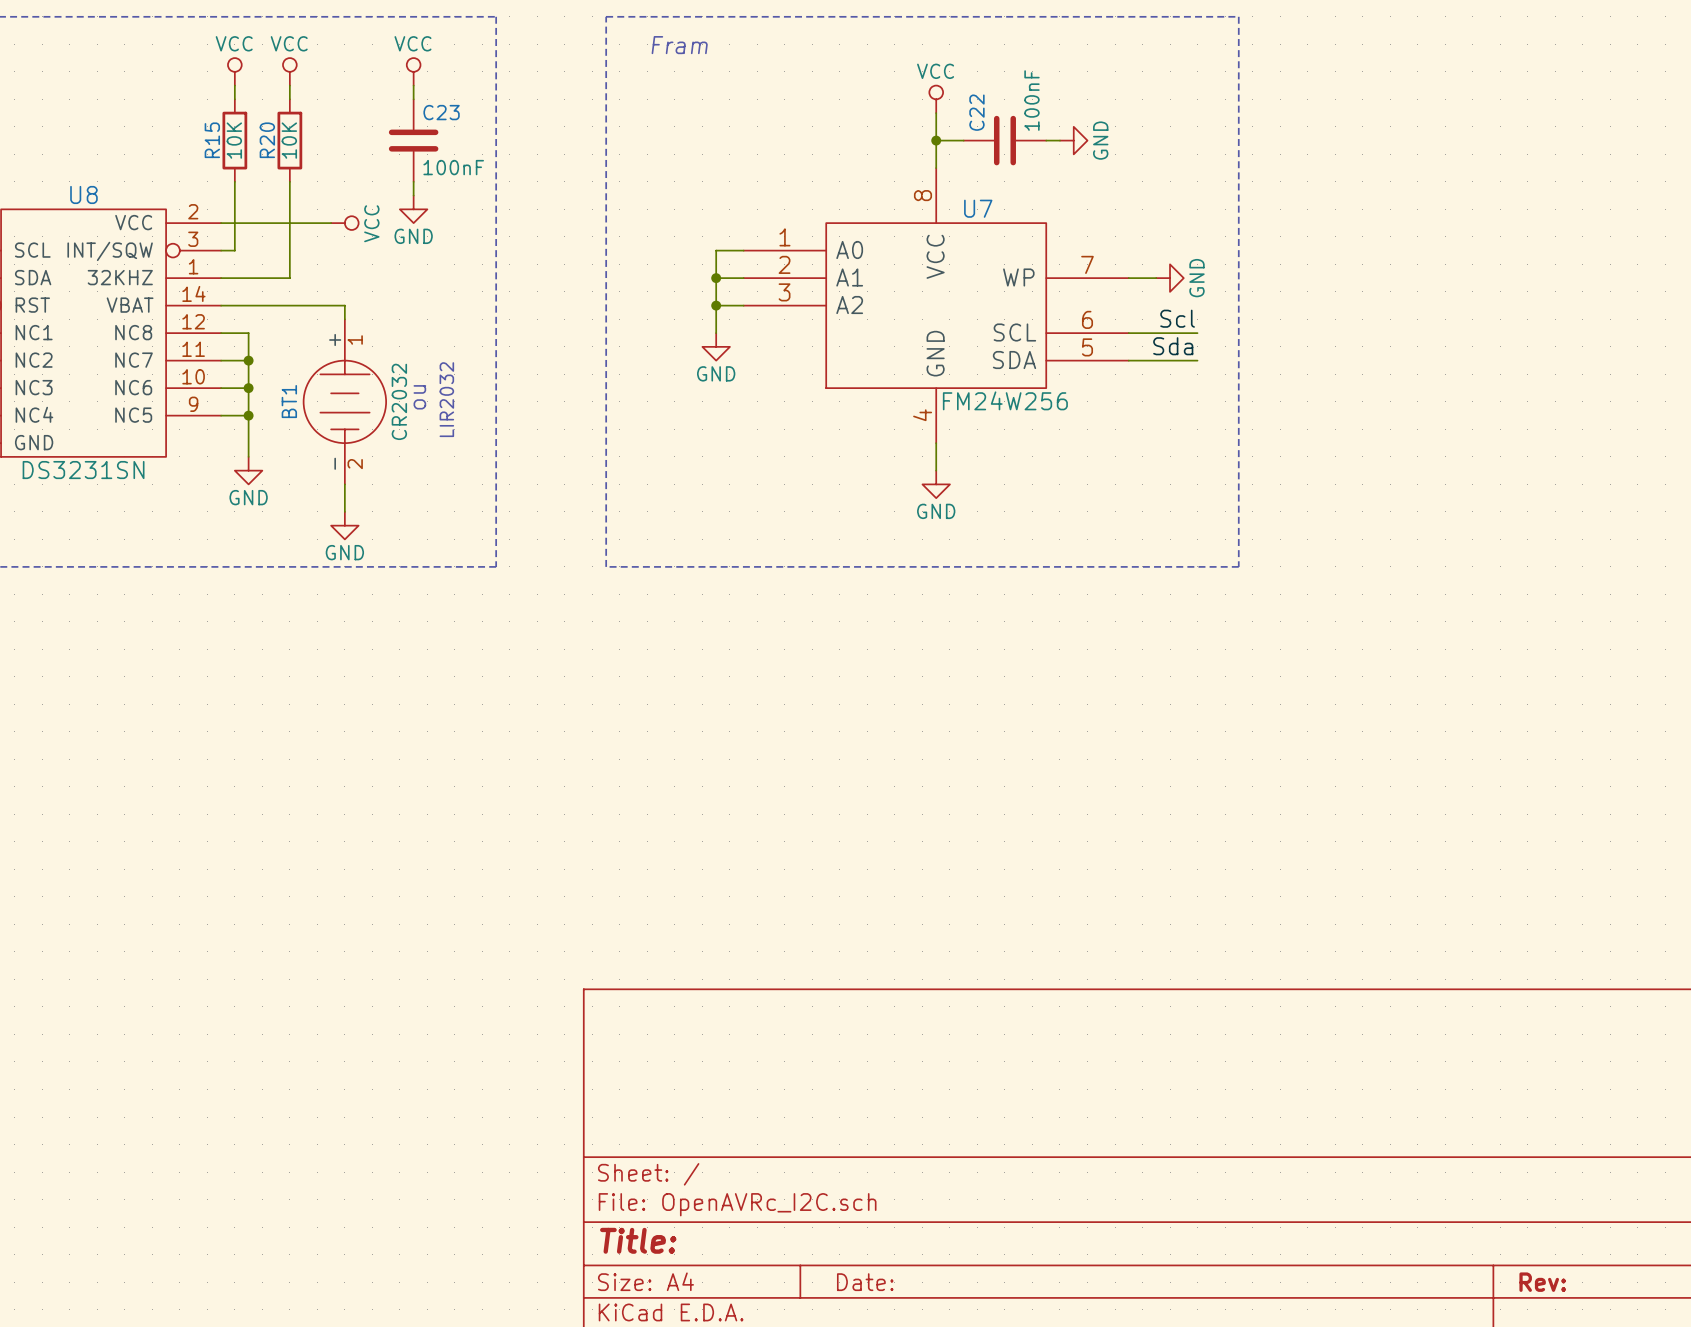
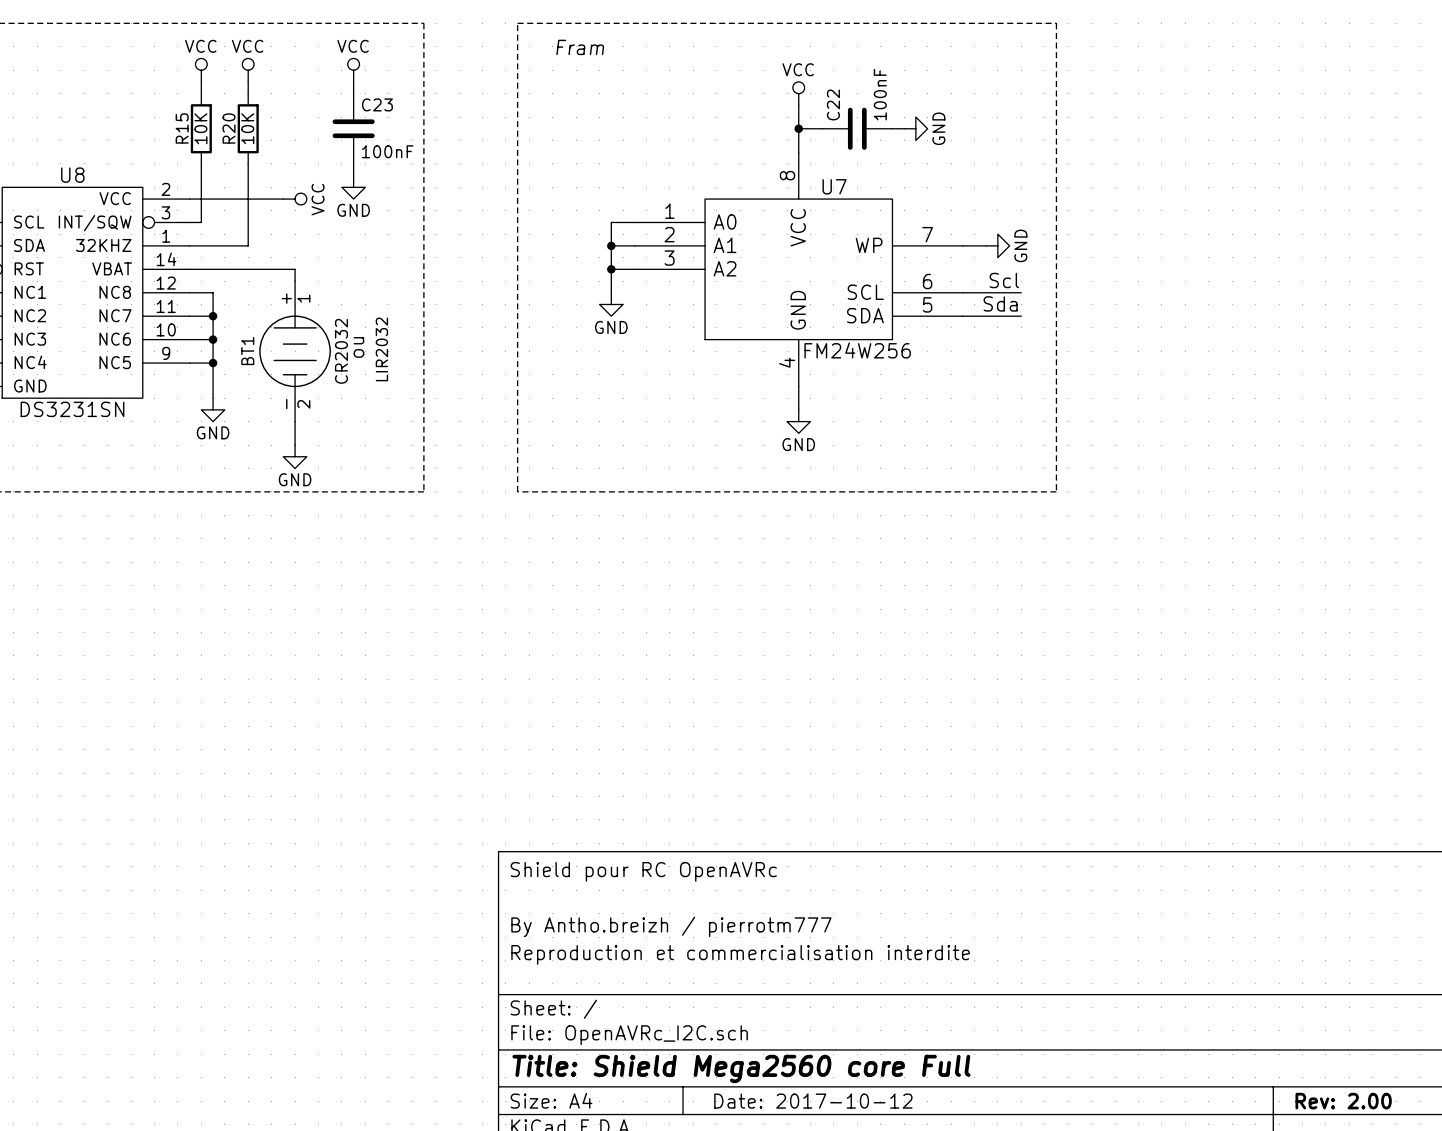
title block: none -> Shield pour RC OpenAVRc (643, 871)
title block: none -> By Antho.breizh / pierrotm777 (671, 926)
title block: none -> Reproduction et commercialisation interdite (740, 954)
title block: Title: (638, 1240) -> Title: Shield Mega2560 core Full (741, 1068)
title block: Date: (865, 1282) -> Date: 2017-10-12 (813, 1101)
title block: Rev: (1542, 1282) -> Rev: 2.00 (1343, 1101)

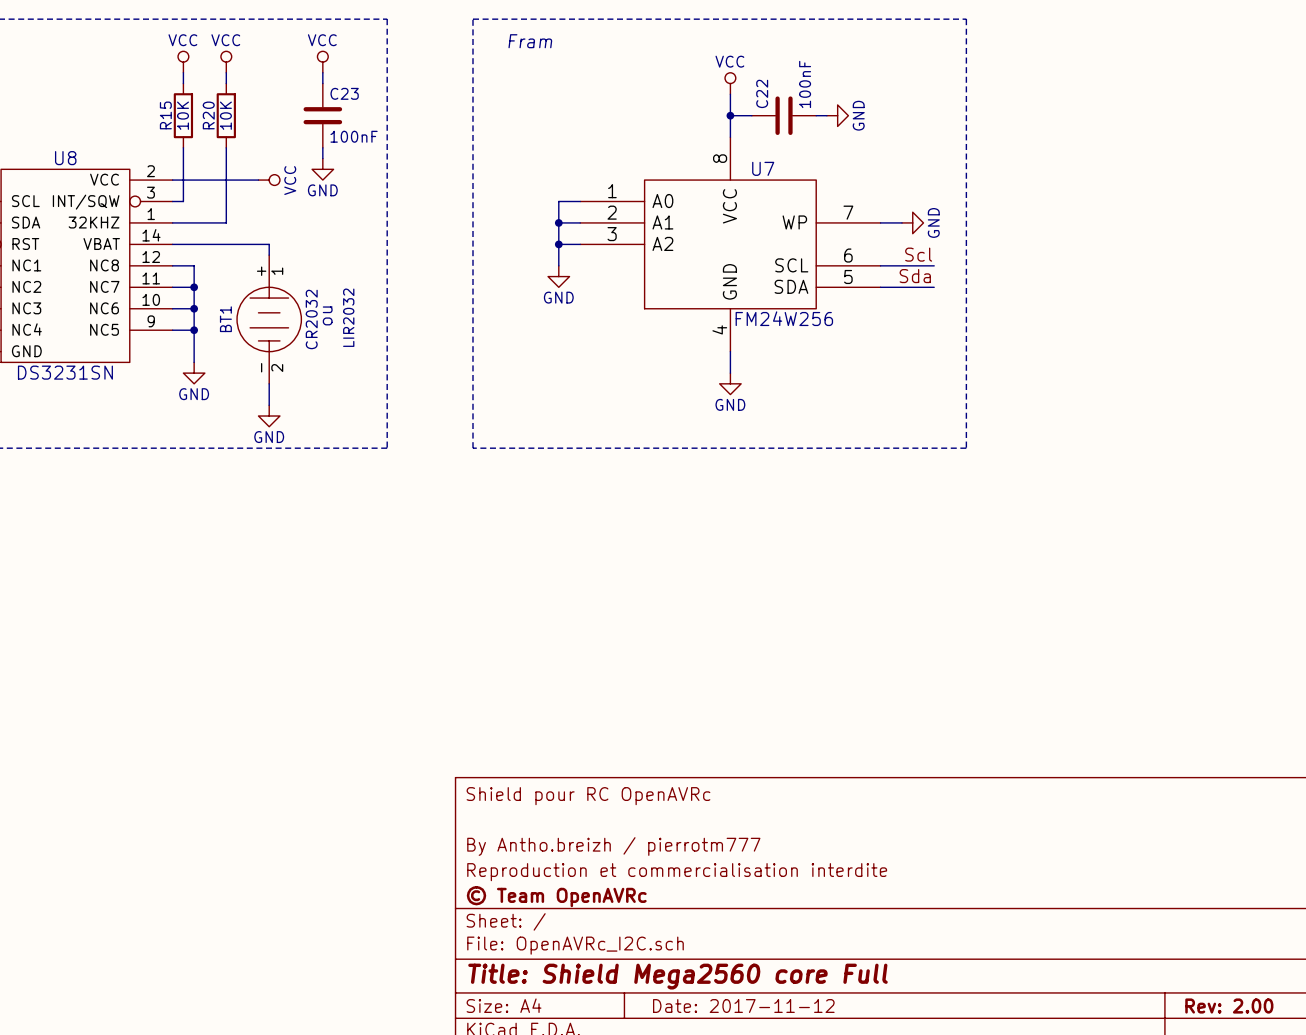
title block: none -> © Team OpenAVRc (556, 896)
title block: Date: 2017-10-12 (813, 1101) -> Date: 2017-11-12 (743, 1006)

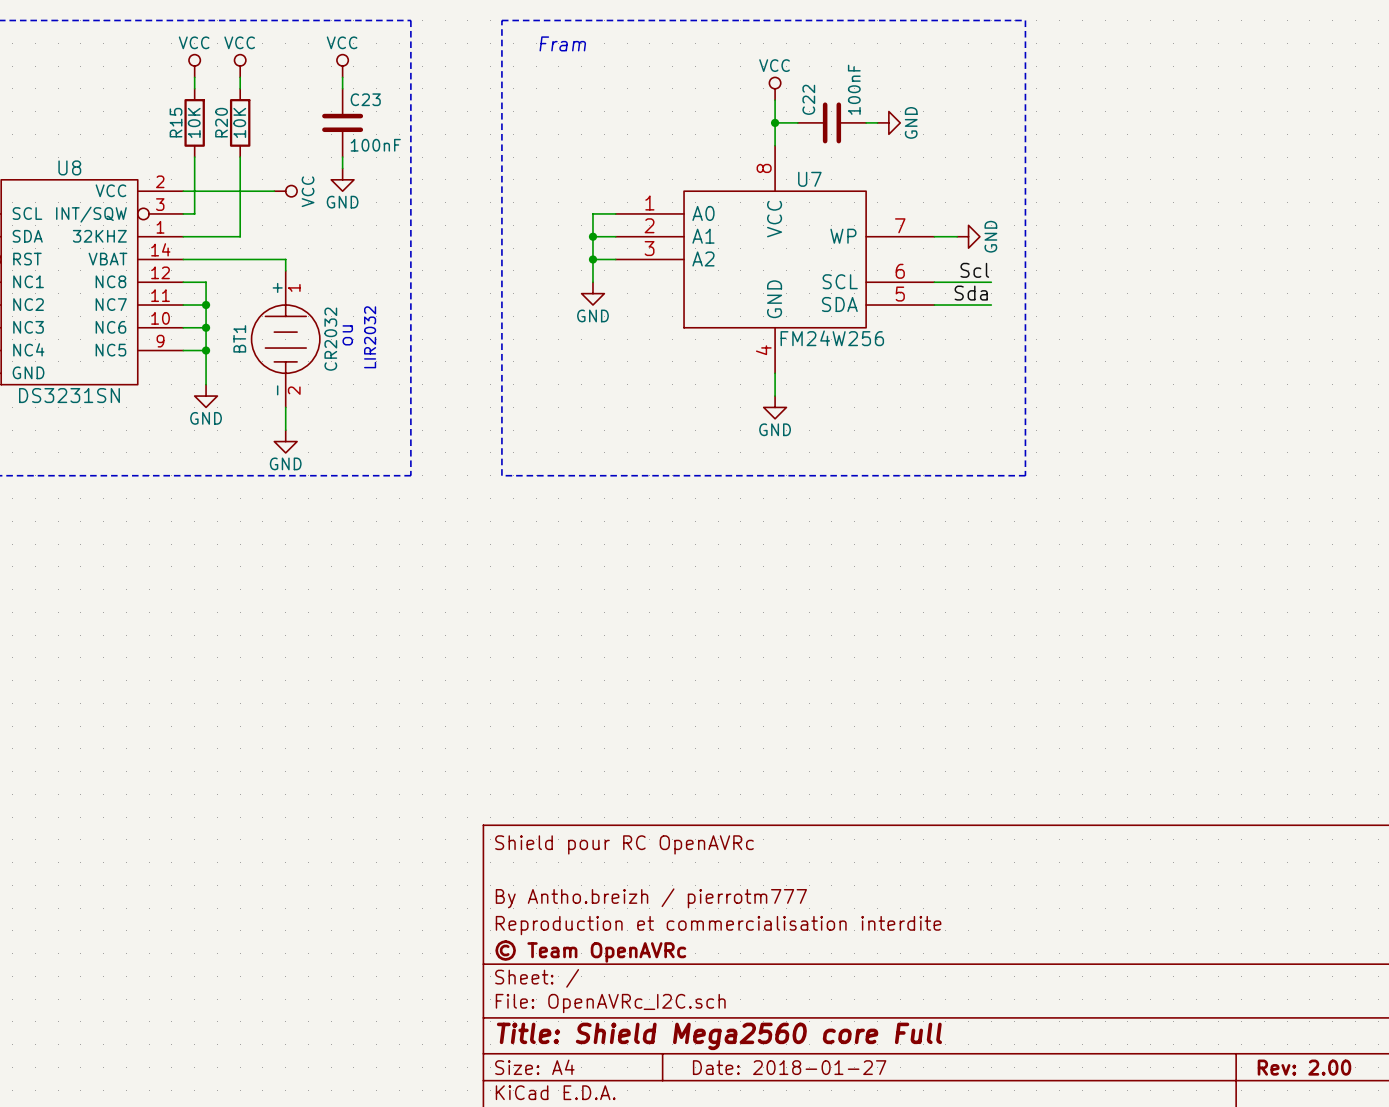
title block: Date: 2017-11-12 (743, 1006) -> Date: 2018-01-27 (789, 1067)

